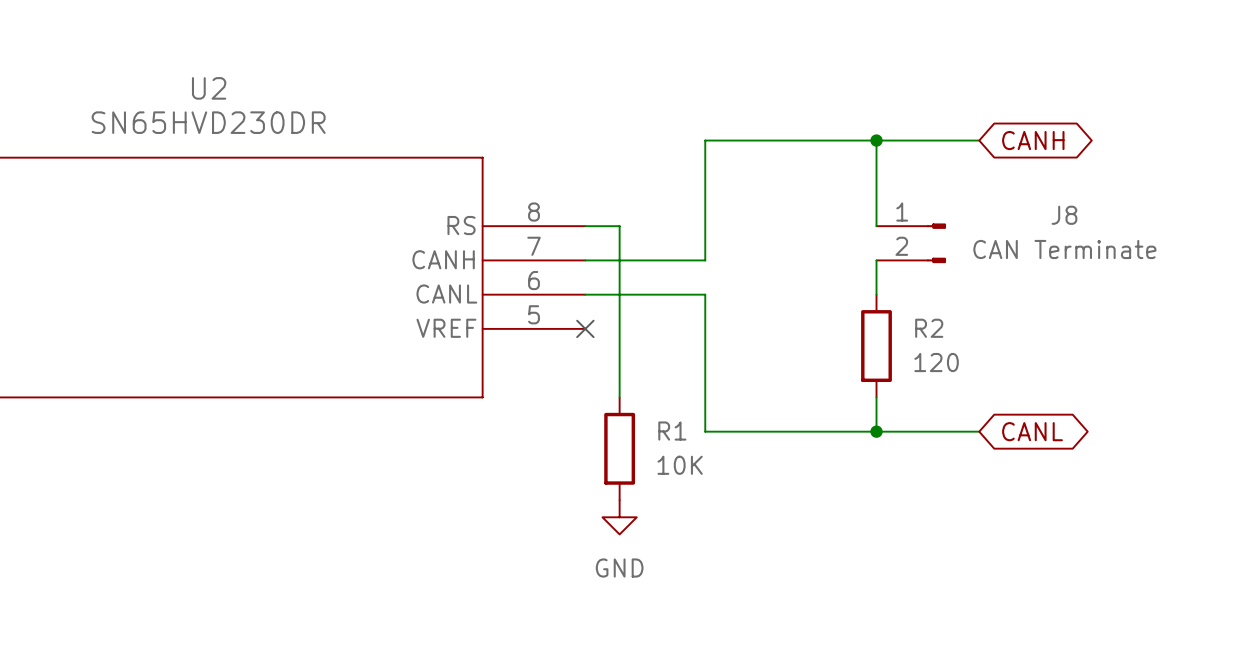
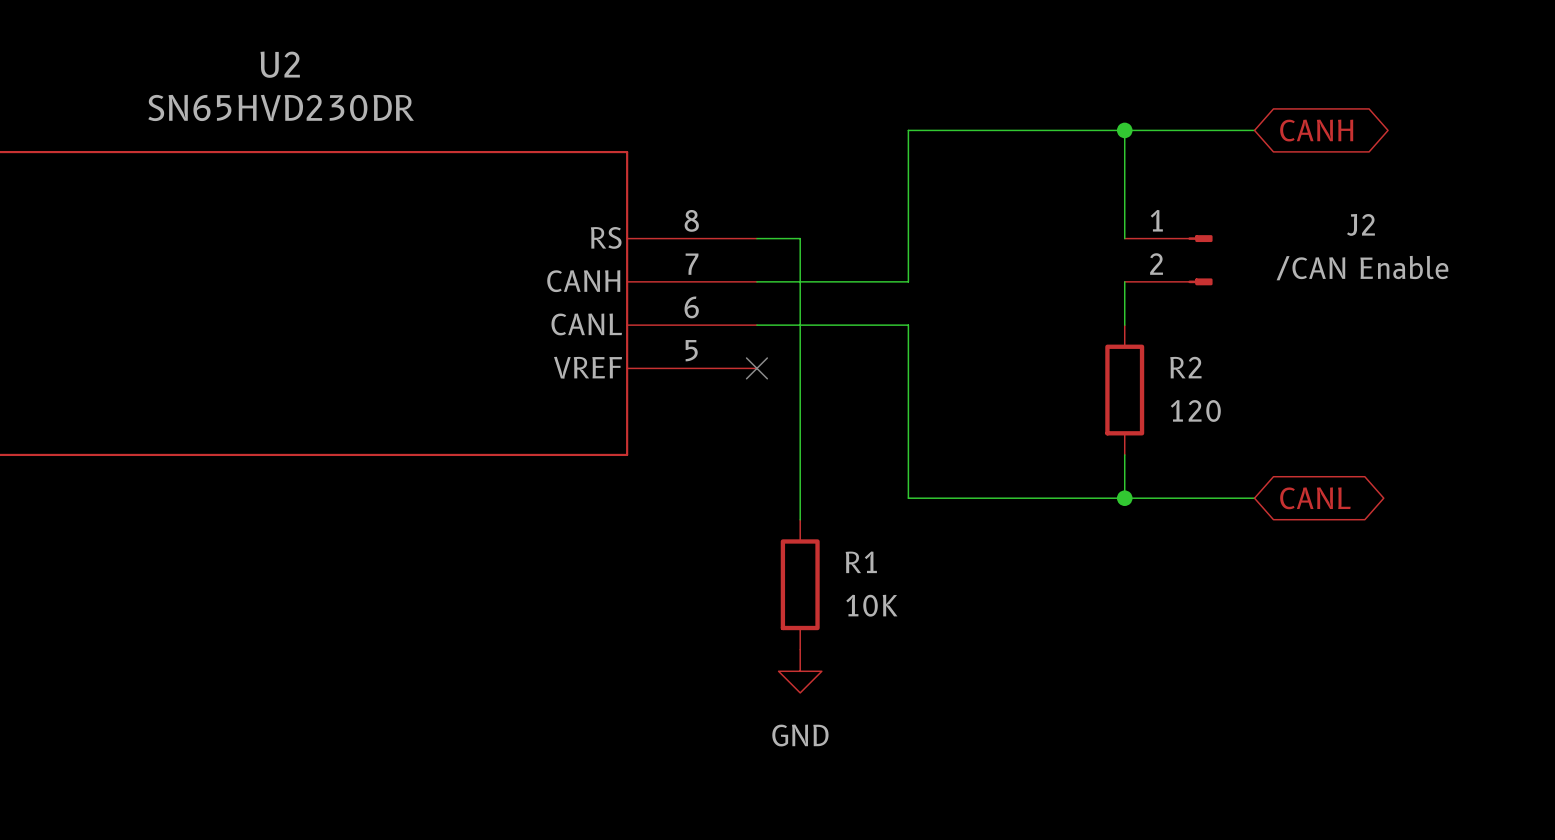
J8 name: J8 (1064, 215) -> J2 (1360, 224)
J8 value: CAN Terminate (1064, 249) -> /CAN Enable (1362, 268)
wire: none -> (800, 454) (800, 519)
R1 position: (619, 448) -> (800, 584)
power symbol position: GND (619, 517) -> GND (800, 671)

